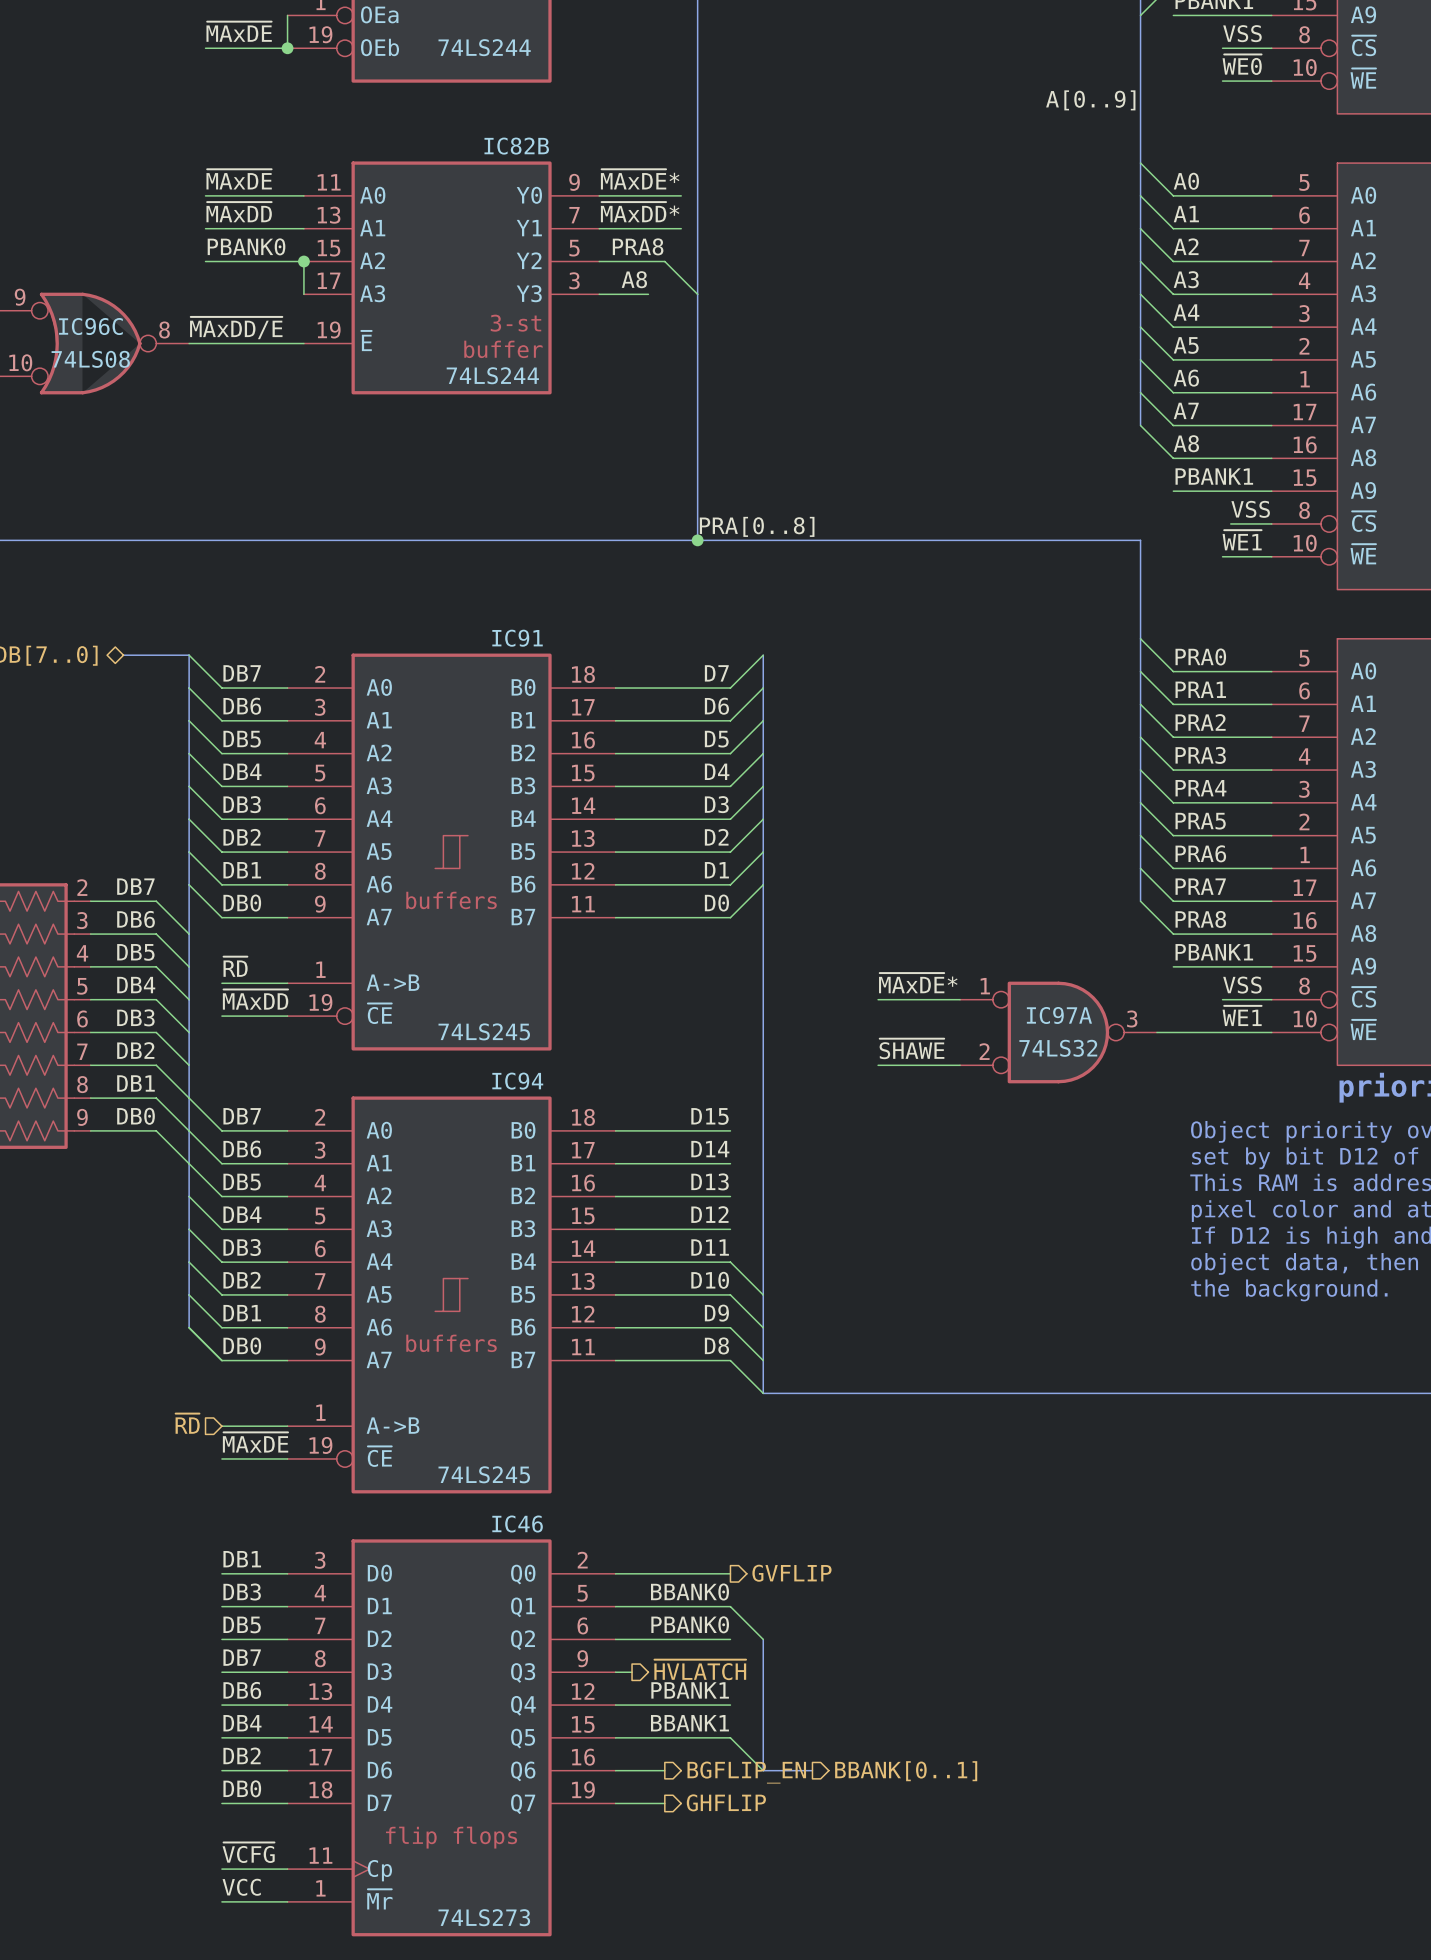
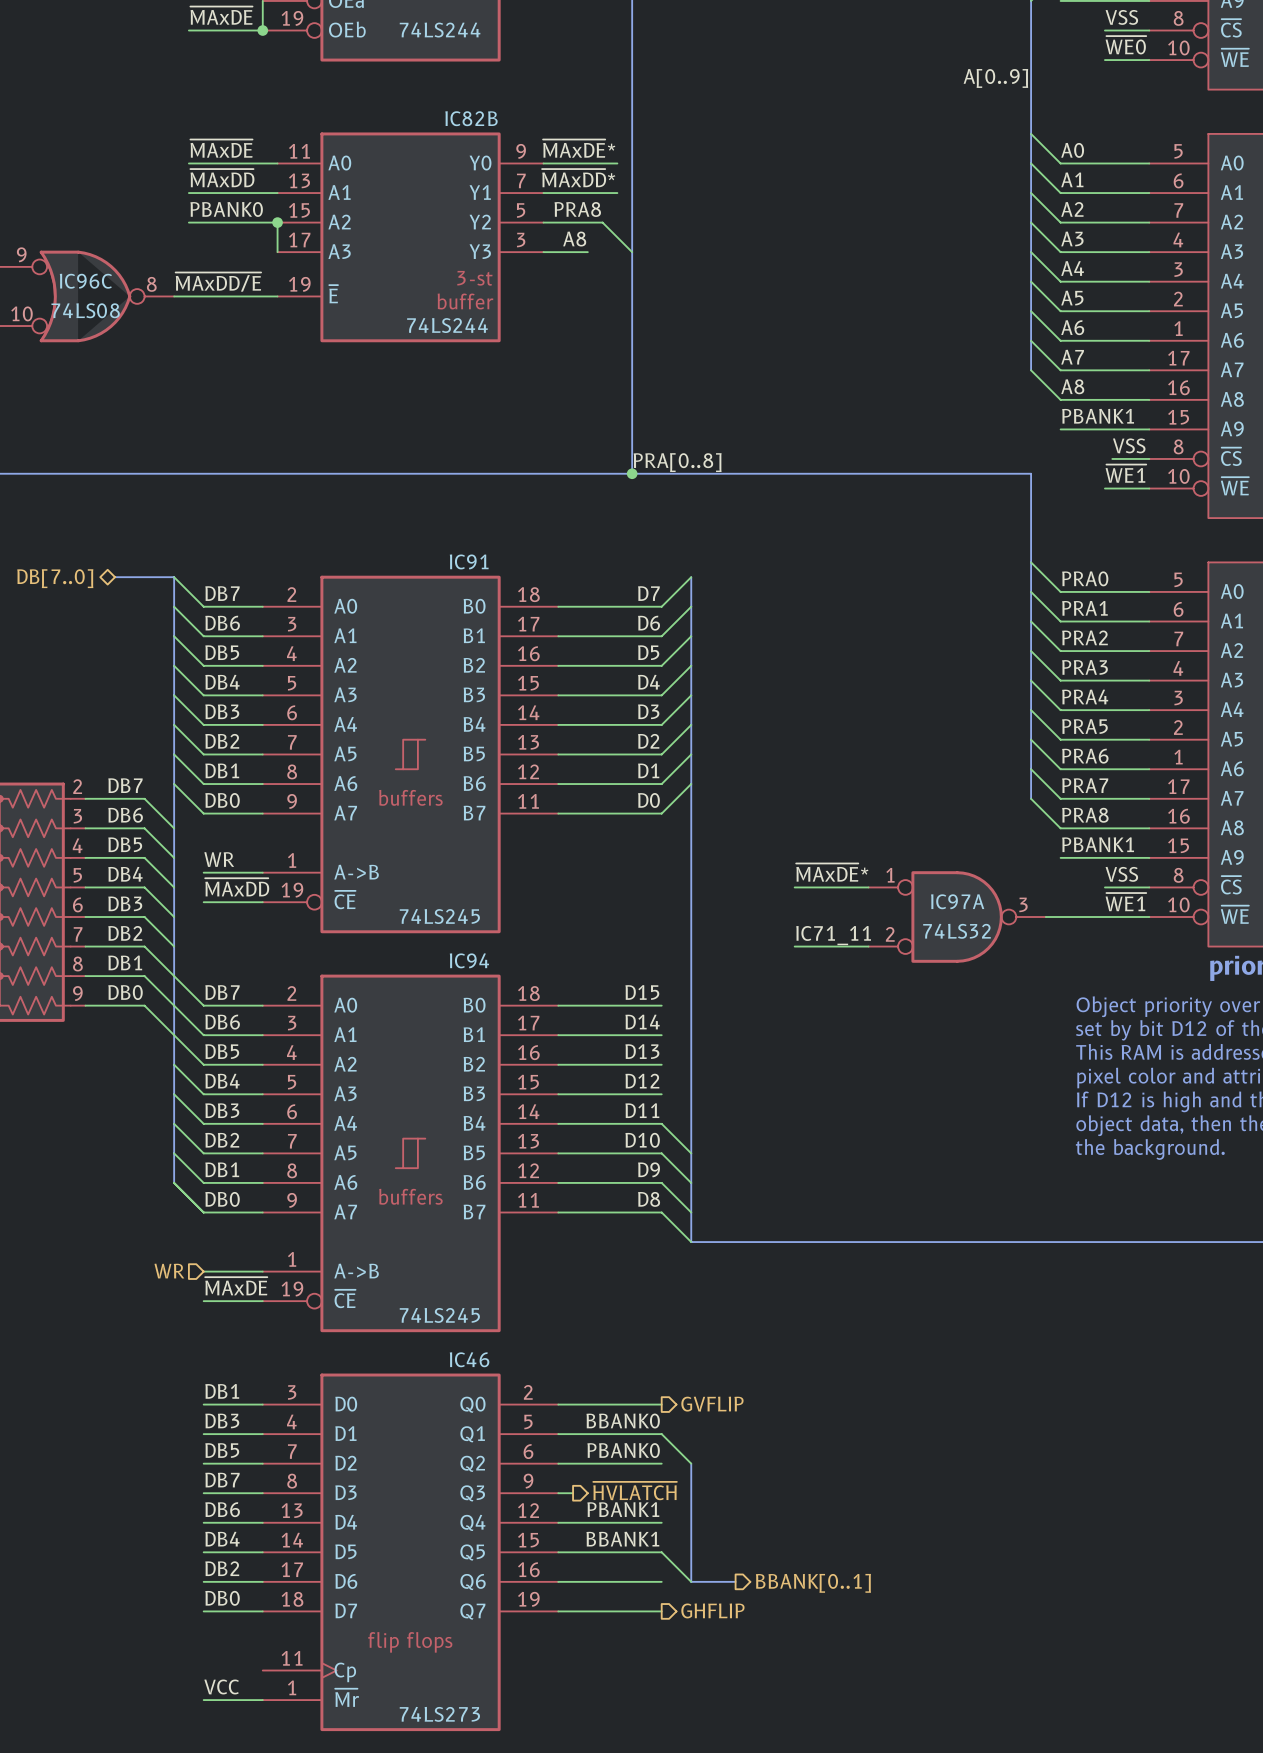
label: ~{RD} (235, 966) -> WR (219, 859)
label: ~{SHAWE} (911, 1048) -> IC71_11 (833, 935)
hierarchical label: ~{RD} (187, 1423) -> WR (169, 1271)
wire: none -> (602, 1581) (661, 1581)
hierarchical label: BGFLIP_EN (746, 1772) -> none
hierarchical label position: GHFLIP (726, 1802) -> GHFLIP (712, 1610)
wire: none -> (602, 1611) (661, 1611)
label: ~{VCFG} (248, 1852) -> none
wire: (221, 1869) (287, 1869) -> none

